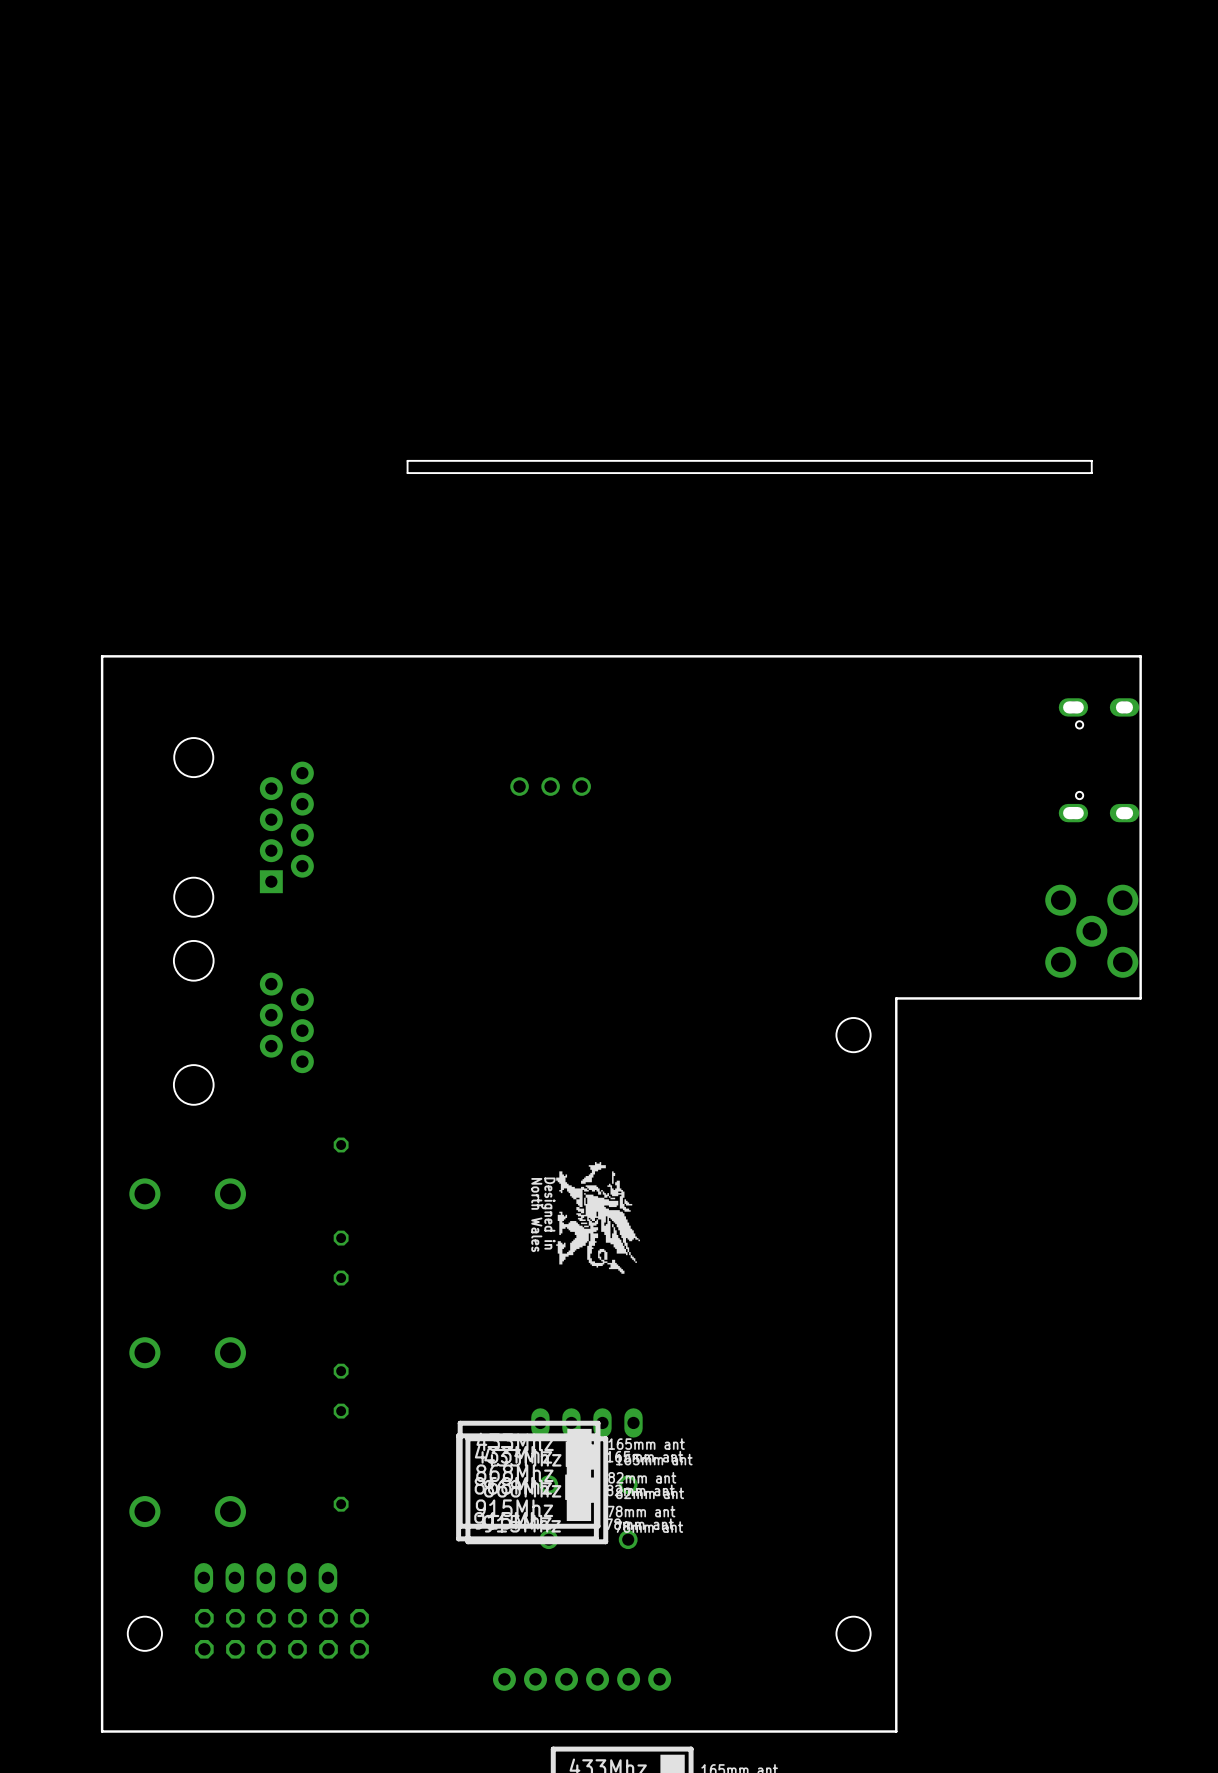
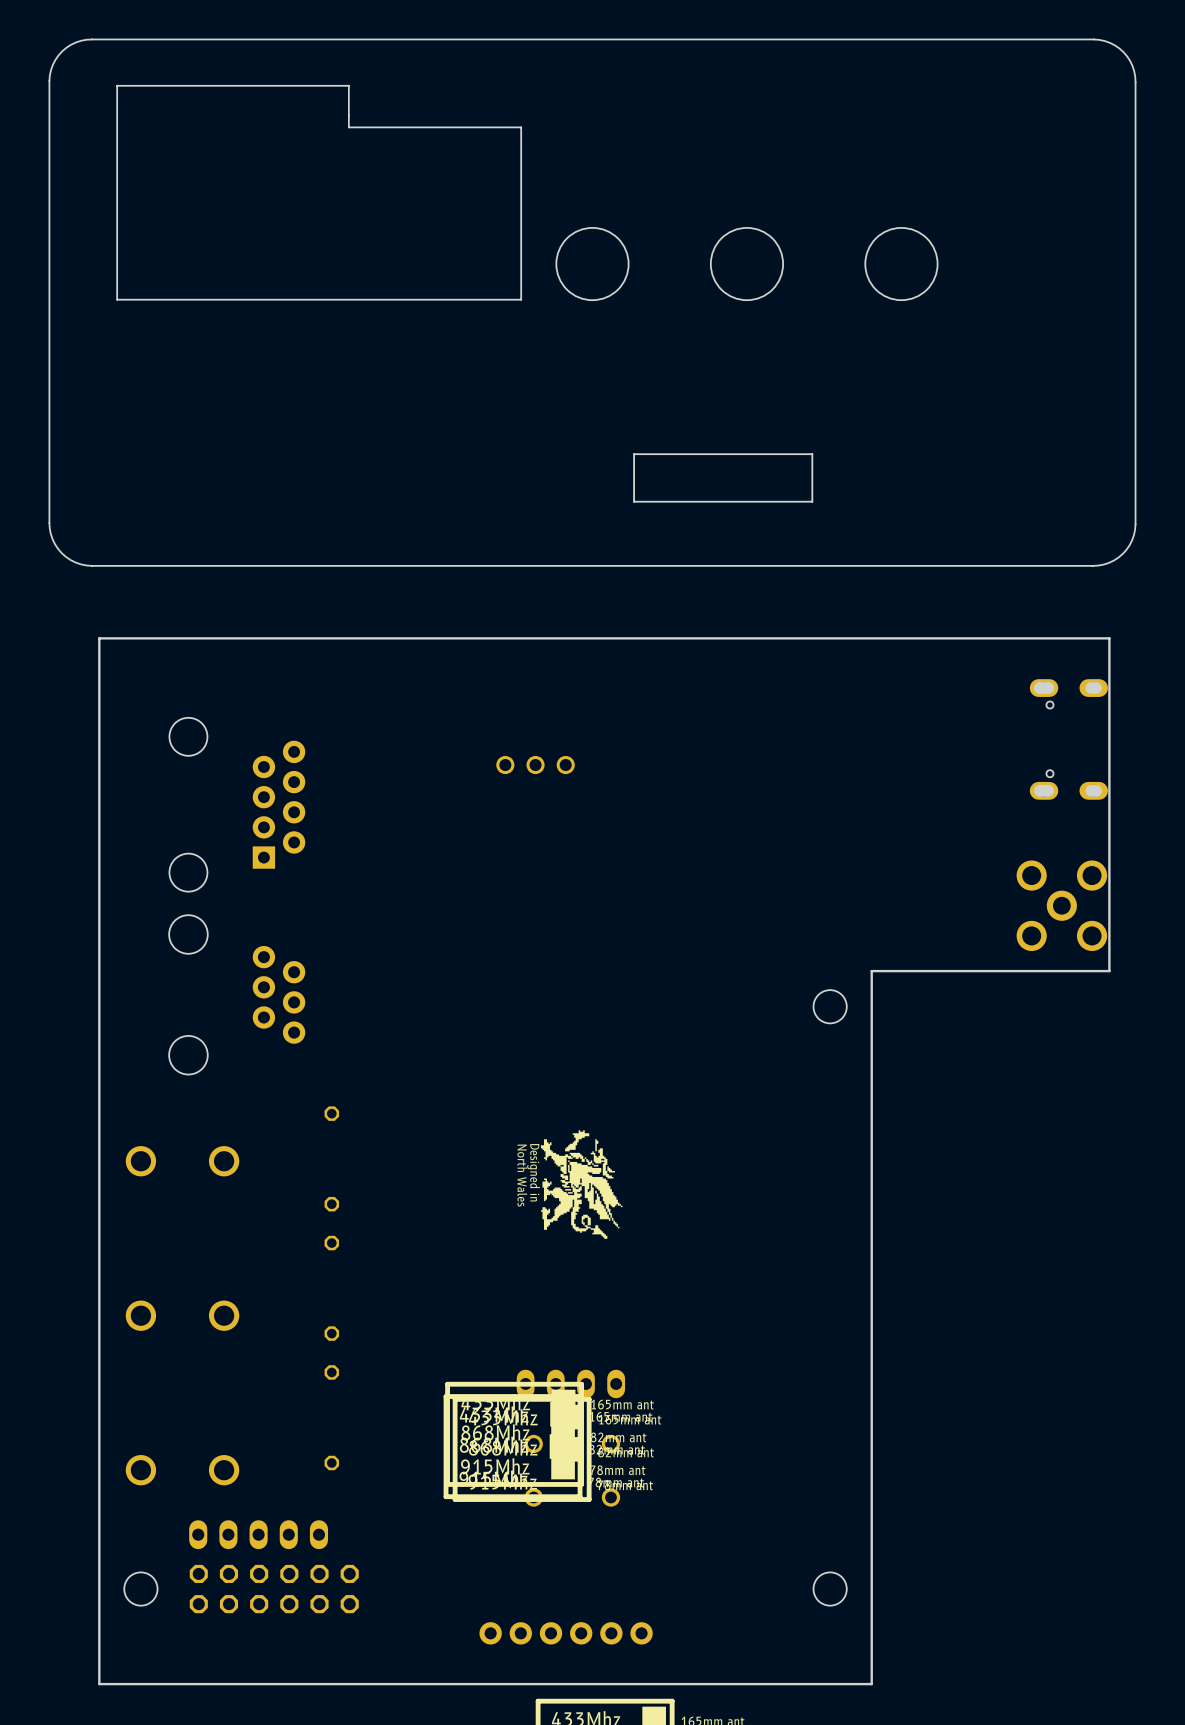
board edge: none -> (1093, 39) (92, 39) (71, 44) (55, 60) (49, 81) (49, 523) (52, 539) (61, 553) (70, 560) (92, 565) (1092, 565) (1113, 560) (1129, 545) (1135, 524) (1135, 82) (1132, 66) (1123, 52) (1110, 42) (1093, 39)
board edge: none -> (348, 85) (348, 127) (521, 127) (521, 299) (117, 299) (117, 85) (348, 85)
round board edge: none -> [555, 227, 630, 301]
round board edge: none -> [710, 227, 784, 301]
round board edge: none -> [864, 227, 939, 301]
board edge: (1091, 460) (1091, 473) (407, 473) (407, 460) (1091, 460) -> none
board edge: none -> (812, 454) (634, 454) (634, 501) (812, 501) (812, 454)

